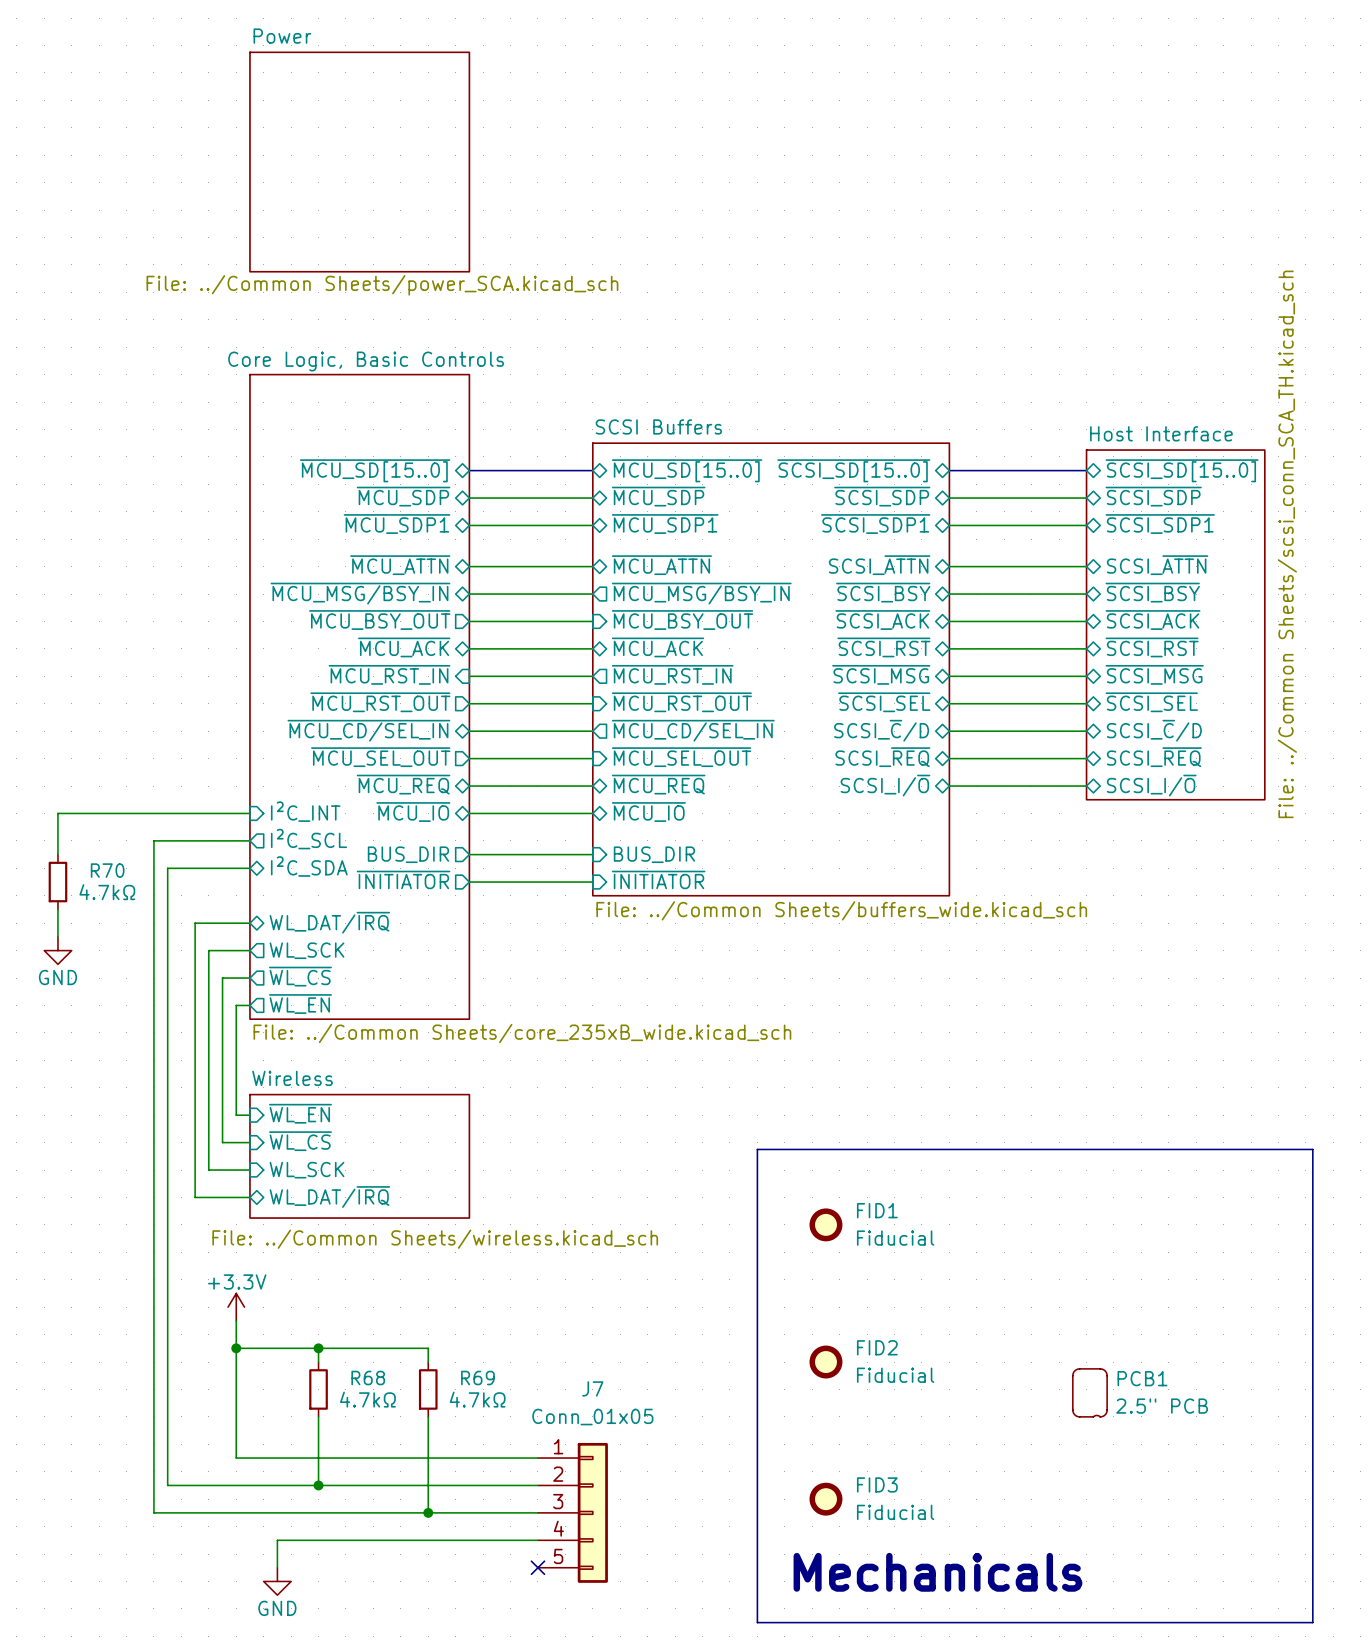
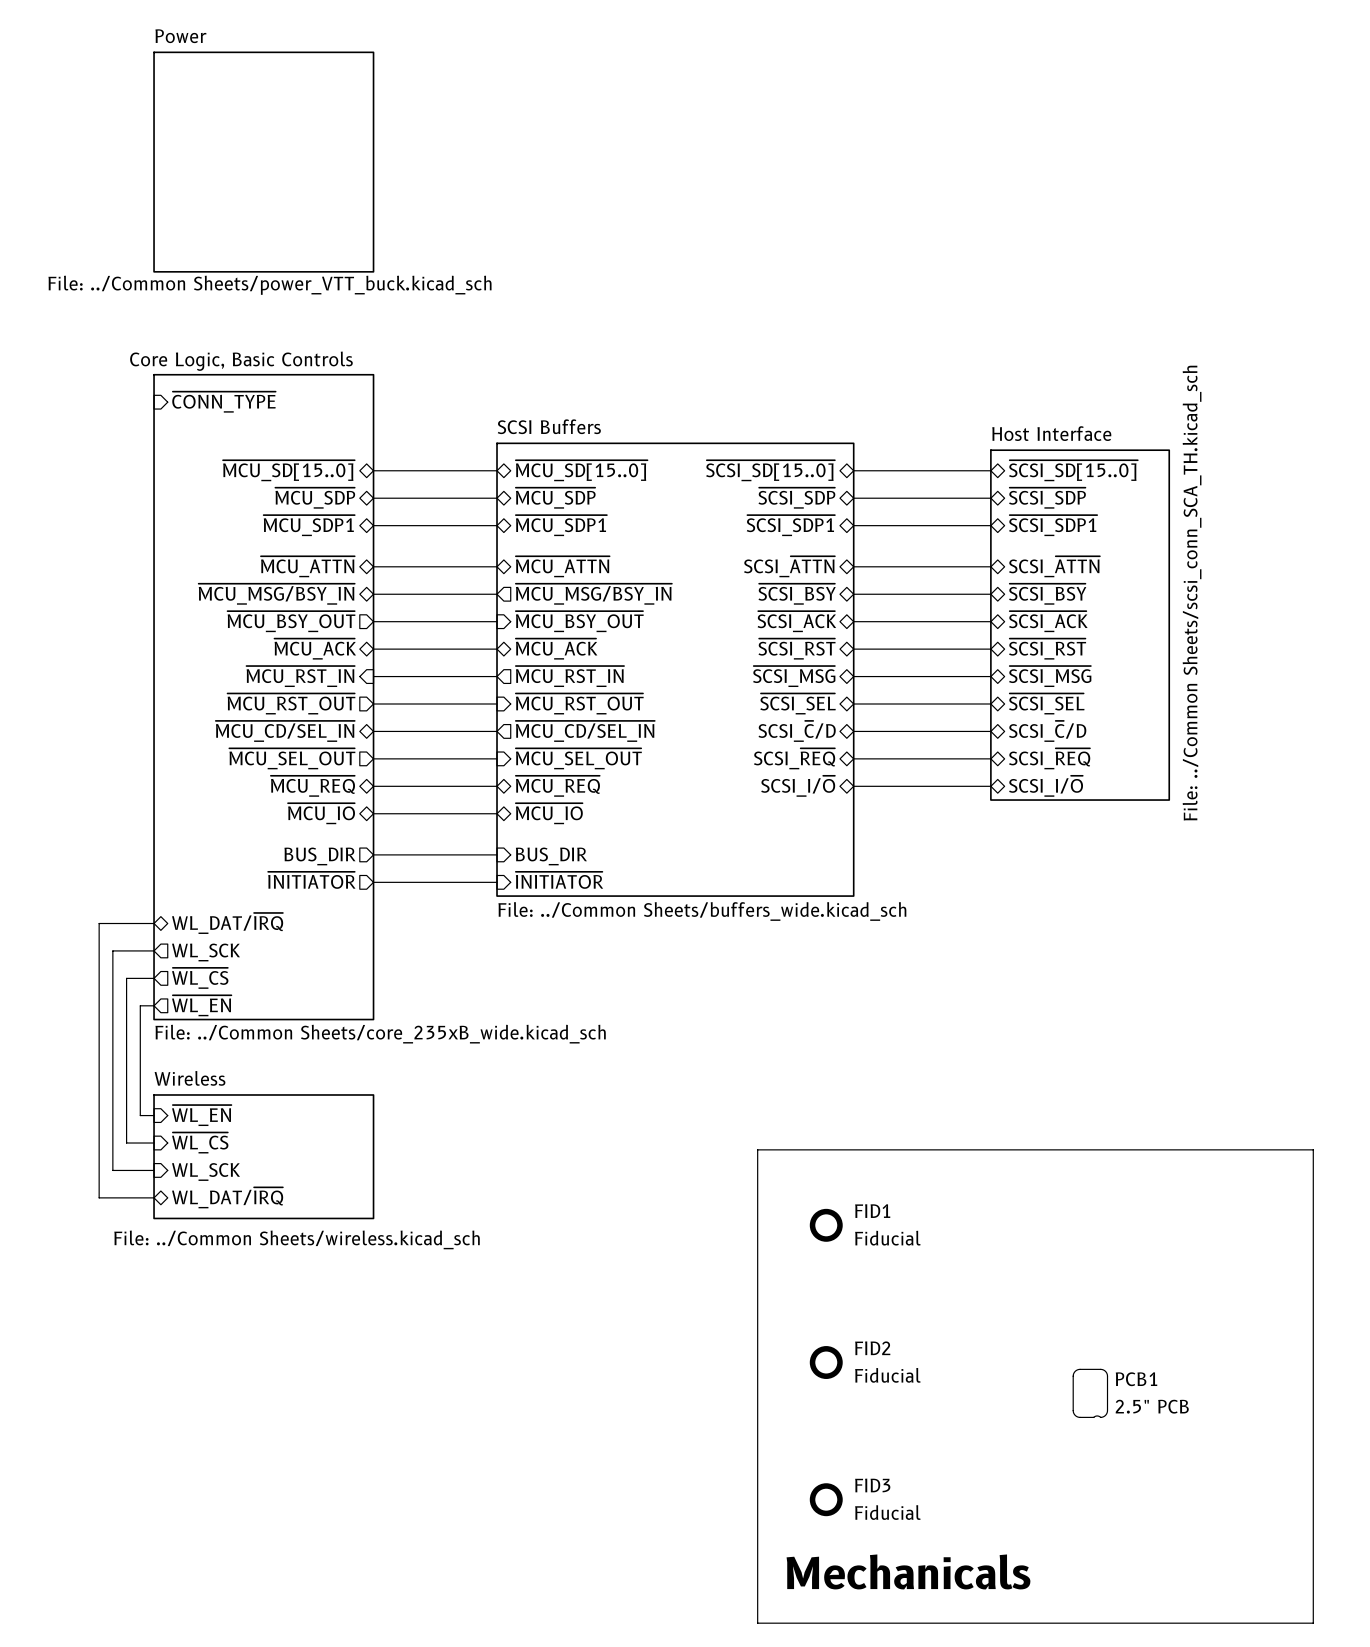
sheet Power: none -> File: ../Common Sheets/power_VTT_buck.kicad_sch (263, 162)
sheet Power: File: ../Common Sheets/power_SCA.kicad_sch (359, 162) -> none
sheet pin: none -> ~{CONN_TYPE} (223, 402)
sheet pin: none -> ~{MCU_SD[15..0]} (288, 470)
sheet pin: ~{MCU_SD[15..0]} (375, 470) -> none
bus: (496, 470) (592, 470) -> (373, 470) (469, 470)
sheet pin: none -> ~{MCU_SD[15..0]} (581, 470)
sheet pin: ~{MCU_SD[15..0]} (687, 470) -> none
sheet pin: none -> ~{SCSI_SD[15..0]} (770, 470)
sheet pin: ~{SCSI_SD[15..0]} (853, 470) -> none
bus: (990, 470) (1086, 470) -> (853, 470) (949, 470)
sheet pin: none -> ~{SCSI_SD[15..0]} (1073, 470)
sheet pin: ~{SCSI_SD[15..0]} (1182, 470) -> none
sheet pin: none -> ~{MCU_SDP} (315, 498)
sheet pin: ~{MCU_SDP} (403, 496) -> none
sheet pin: none -> ~{MCU_SDP} (555, 498)
sheet pin: ~{MCU_SDP} (658, 496) -> none
sheet pin: none -> ~{SCSI_SDP} (796, 498)
sheet pin: ~{SCSI_SDP} (882, 496) -> none
sheet pin: none -> ~{SCSI_SDP} (1047, 498)
sheet pin: ~{SCSI_SDP} (1153, 496) -> none
wire: (496, 498) (592, 498) -> (373, 498) (469, 498)
wire: (990, 498) (1086, 498) -> (853, 498) (949, 498)
sheet pin: none -> ~{MCU_SDP1} (309, 525)
sheet pin: ~{MCU_SDP1} (397, 524) -> none
sheet pin: none -> ~{MCU_SDP1} (561, 525)
sheet pin: ~{MCU_SDP1} (665, 524) -> none
sheet pin: none -> ~{SCSI_SDP1} (790, 525)
sheet pin: ~{SCSI_SDP1} (875, 524) -> none
sheet pin: none -> ~{SCSI_SDP1} (1053, 525)
sheet pin: ~{SCSI_SDP1} (1160, 524) -> none
wire: (496, 525) (592, 525) -> (373, 525) (469, 525)
wire: (990, 525) (1086, 525) -> (853, 525) (949, 525)
sheet pin position: ~{MCU_ATTN} (400, 565) -> ~{MCU_ATTN} (307, 566)
sheet pin position: ~{MCU_ATTN} (661, 565) -> ~{MCU_ATTN} (562, 566)
sheet pin position: SCSI_~{ATTN} (879, 565) -> SCSI_~{ATTN} (789, 566)
sheet pin position: SCSI_~{ATTN} (1157, 565) -> SCSI_~{ATTN} (1054, 566)
wire: (496, 566) (592, 566) -> (373, 566) (469, 566)
wire: (990, 566) (1086, 566) -> (853, 566) (949, 566)
sheet pin: none -> ~{SCSI_BSY} (797, 594)
sheet pin: ~{SCSI_BSY} (883, 592) -> none
sheet pin: none -> ~{SCSI_BSY} (1047, 594)
sheet pin: ~{SCSI_BSY} (1152, 592) -> none
sheet pin: none -> ~{MCU_MSG/BSY_IN} (276, 594)
sheet pin: ~{MCU_MSG/BSY_IN} (360, 593) -> none
sheet pin: none -> ~{MCU_MSG/BSY_IN} (593, 594)
sheet pin: ~{MCU_MSG/BSY_IN} (701, 593) -> none
wire: (496, 594) (592, 594) -> (373, 594) (469, 594)
wire: (990, 594) (1086, 594) -> (853, 594) (949, 594)
sheet pin: none -> ~{MCU_BSY_OUT} (291, 621)
sheet pin: ~{MCU_BSY_OUT} (379, 620) -> none
sheet pin: none -> ~{MCU_BSY_OUT} (579, 621)
sheet pin: ~{MCU_BSY_OUT} (682, 620) -> none
sheet pin: none -> ~{SCSI_ACK} (796, 621)
sheet pin: ~{SCSI_ACK} (882, 620) -> none
sheet pin: none -> ~{SCSI_ACK} (1048, 621)
sheet pin: ~{SCSI_ACK} (1153, 620) -> none
wire: (496, 621) (592, 621) -> (373, 621) (469, 621)
wire: (990, 621) (1086, 621) -> (853, 621) (949, 621)
sheet Host Interface position: (1175, 624) -> (1080, 625)
sheet pin: none -> ~{MCU_ACK} (315, 649)
sheet pin: ~{MCU_ACK} (404, 647) -> none
sheet pin: none -> ~{MCU_ACK} (556, 649)
sheet pin: ~{MCU_ACK} (658, 647) -> none
sheet pin: none -> ~{SCSI_RST} (797, 649)
sheet pin: ~{SCSI_RST} (883, 647) -> none
sheet pin: none -> ~{SCSI_RST} (1047, 649)
sheet pin: ~{SCSI_RST} (1152, 647) -> none
wire: (496, 648) (592, 648) -> (373, 649) (469, 649)
wire: (990, 648) (1086, 648) -> (853, 649) (949, 649)
sheet SCSI Buffers position: (771, 669) -> (675, 669)
sheet pin: none -> ~{MCU_RST_IN} (300, 676)
sheet pin: ~{MCU_RST_IN} (389, 674) -> none
sheet pin: none -> ~{MCU_RST_IN} (569, 676)
sheet pin: ~{MCU_RST_IN} (672, 674) -> none
sheet pin: none -> ~{SCSI_MSG} (794, 676)
sheet pin: ~{SCSI_MSG} (881, 674) -> none
sheet pin: none -> ~{SCSI_MSG} (1050, 676)
sheet pin: ~{SCSI_MSG} (1154, 674) -> none
wire: (496, 676) (592, 676) -> (373, 676) (469, 676)
wire: (990, 676) (1086, 676) -> (853, 676) (949, 676)
sheet Core Logic, Basic Controls position: (359, 696) -> (263, 697)
sheet pin: none -> ~{MCU_RST_OUT} (291, 703)
sheet pin: ~{MCU_RST_OUT} (380, 702) -> none
sheet pin: none -> ~{MCU_RST_OUT} (579, 703)
sheet pin: ~{MCU_RST_OUT} (681, 702) -> none
sheet pin: none -> ~{SCSI_SEL} (798, 703)
sheet pin: ~{SCSI_SEL} (884, 702) -> none
sheet pin: none -> ~{SCSI_SEL} (1046, 703)
sheet pin: ~{SCSI_SEL} (1151, 702) -> none
wire: (496, 703) (592, 703) -> (373, 703) (469, 703)
wire: (990, 703) (1086, 703) -> (853, 703) (949, 703)
sheet pin: none -> ~{MCU_CD/SEL_IN} (285, 731)
sheet pin: ~{MCU_CD/SEL_IN} (368, 730) -> none
sheet pin: none -> ~{MCU_CD/SEL_IN} (585, 731)
sheet pin: ~{MCU_CD/SEL_IN} (693, 730) -> none
sheet pin: none -> SCSI_~{C}/D (797, 731)
sheet pin: SCSI_~{C}/D (881, 730) -> none
sheet pin: none -> SCSI_~{C}/D (1047, 731)
sheet pin: SCSI_~{C}/D (1154, 730) -> none
wire: (496, 731) (592, 731) -> (373, 731) (469, 731)
wire: (990, 731) (1086, 731) -> (853, 731) (949, 731)
sheet pin: none -> ~{MCU_SEL_OUT} (292, 758)
sheet pin: ~{MCU_SEL_OUT} (380, 757) -> none
sheet pin: none -> ~{MCU_SEL_OUT} (578, 758)
sheet pin: ~{MCU_SEL_OUT} (681, 757) -> none
sheet pin: none -> SCSI_~{REQ} (794, 758)
sheet pin: SCSI_~{REQ} (882, 757) -> none
sheet pin: none -> SCSI_~{REQ} (1049, 758)
sheet pin: SCSI_~{REQ} (1154, 757) -> none
wire: (496, 758) (592, 758) -> (373, 758) (469, 758)
wire: (990, 758) (1086, 758) -> (853, 758) (949, 758)
sheet pin: none -> ~{MCU_REQ} (312, 786)
sheet pin: ~{MCU_REQ} (403, 784) -> none
sheet pin: none -> ~{MCU_REQ} (557, 786)
sheet pin: ~{MCU_REQ} (658, 784) -> none
sheet pin: none -> SCSI_I/~{O} (798, 786)
sheet pin: SCSI_I/~{O} (885, 785) -> none
sheet pin: none -> SCSI_I/~{O} (1046, 786)
sheet pin: SCSI_I/~{O} (1151, 785) -> none
wire: (496, 786) (592, 786) -> (373, 786) (469, 786)
wire: (990, 786) (1086, 786) -> (853, 786) (949, 786)
sheet pin: I²C_INT (305, 811) -> none
sheet pin: none -> ~{MCU_IO} (321, 813)
sheet pin: ~{MCU_IO} (413, 812) -> none
sheet pin: none -> ~{MCU_IO} (549, 813)
sheet pin: ~{MCU_IO} (648, 812) -> none
wire: (249, 813) (57, 813) (57, 854) -> none
wire: (496, 813) (592, 813) -> (373, 813) (469, 813)
sheet pin: I²C_SCL (308, 839) -> none
wire: (249, 840) (153, 840) (153, 1512) (537, 1512) -> none
sheet pin position: BUS_DIR (408, 854) -> BUS_DIR (319, 856)
wire: (496, 854) (592, 854) -> (373, 854) (469, 854)
sheet pin position: BUS_DIR (654, 854) -> BUS_DIR (551, 856)
sheet pin: I²C_SDA (309, 866) -> none
wire: (249, 868) (167, 868) (167, 1485) (537, 1485) -> none
sheet pin position: ~{INITIATOR} (403, 879) -> ~{INITIATOR} (311, 880)
sheet pin position: ~{INITIATOR} (658, 879) -> ~{INITIATOR} (559, 880)
R70: 4.7kΩ (57, 882) -> none
wire: (496, 882) (592, 882) -> (373, 882) (469, 882)
wire: (57, 909) (57, 936) -> none
sheet pin position: WL_DAT/~{IRQ} (329, 922) -> WL_DAT/~{IRQ} (227, 923)
wire: (249, 923) (195, 923) (195, 1197) (249, 1197) -> (154, 923) (99, 923) (99, 1197) (154, 1197)
power symbol: GND (57, 950) -> none
wire: (249, 950) (208, 950) (208, 1170) (249, 1170) -> (154, 950) (112, 950) (112, 1170) (154, 1170)
sheet pin position: WL_SCK (307, 950) -> WL_SCK (206, 952)
sheet pin: none -> ~{WL_CS} (200, 978)
sheet pin: ~{WL_CS} (300, 976) -> none
wire: (249, 978) (222, 978) (222, 1142) (249, 1142) -> (154, 978) (126, 978) (126, 1143) (154, 1143)
sheet pin: none -> ~{WL_EN} (201, 1005)
sheet pin: ~{WL_EN} (300, 1004) -> none
wire: (249, 1005) (236, 1005) (236, 1115) (249, 1115) -> (154, 1005) (140, 1005) (140, 1115) (154, 1115)
sheet pin: none -> ~{WL_EN} (201, 1115)
sheet pin: ~{WL_EN} (300, 1113) -> none
sheet pin: none -> ~{WL_CS} (200, 1142)
sheet pin: ~{WL_CS} (300, 1141) -> none
sheet Wireless position: (359, 1156) -> (263, 1156)
sheet pin position: WL_SCK (307, 1170) -> WL_SCK (206, 1171)
sheet pin position: WL_DAT/~{IRQ} (329, 1197) -> WL_DAT/~{IRQ} (227, 1197)
power symbol: +3.3V (236, 1307) -> none
wire: (236, 1320) (236, 1458) (537, 1458) -> none
wire: (236, 1348) (428, 1348) (428, 1362) -> none
junction: (236, 1348) -> none
wire: (318, 1348) (318, 1362) -> none
junction: (318, 1348) -> none
R68: 4.7kΩ (318, 1389) -> none
R69: 4.7kΩ (428, 1389) -> none
wire: (318, 1416) (318, 1485) -> none
wire: (428, 1416) (428, 1512) -> none
junction: (318, 1485) -> none
junction: (428, 1512) -> none
J7: Conn_01x05 (572, 1512) -> none
wire: (537, 1540) (277, 1540) (277, 1567) -> none
no-connect mark: (537, 1567) -> none
power symbol: GND (277, 1581) -> none

